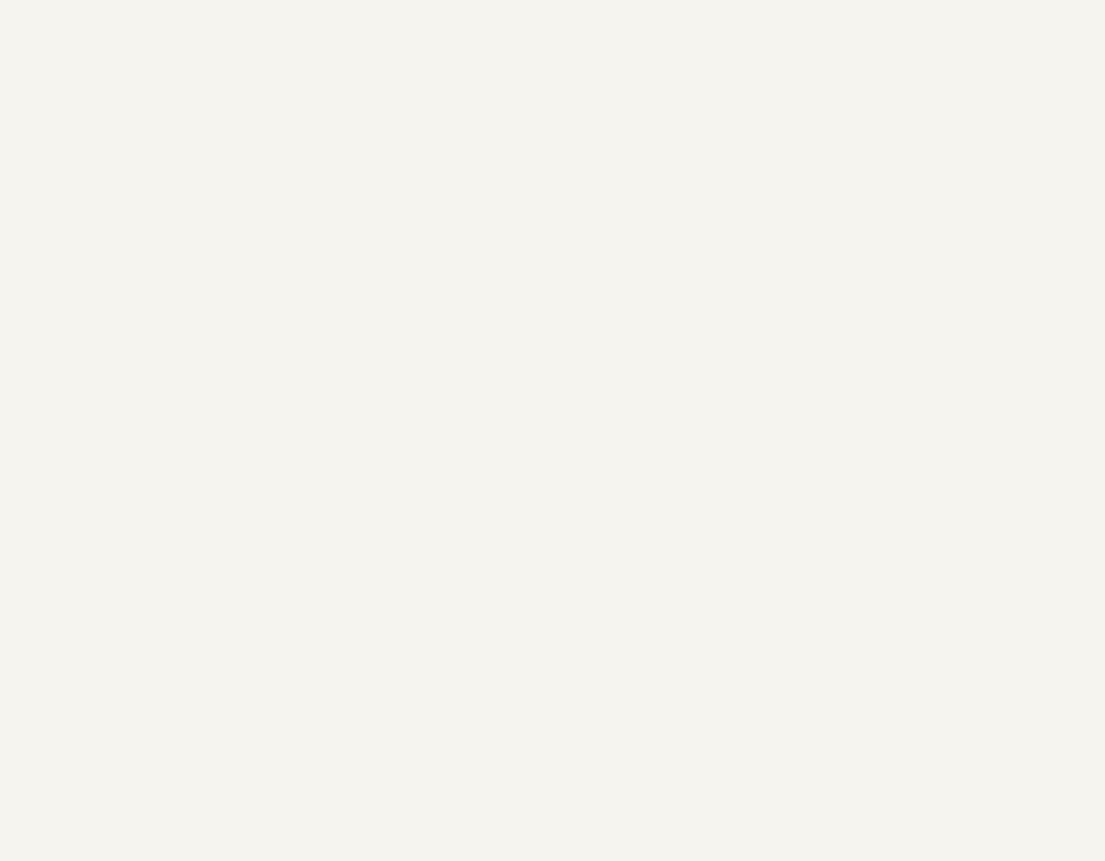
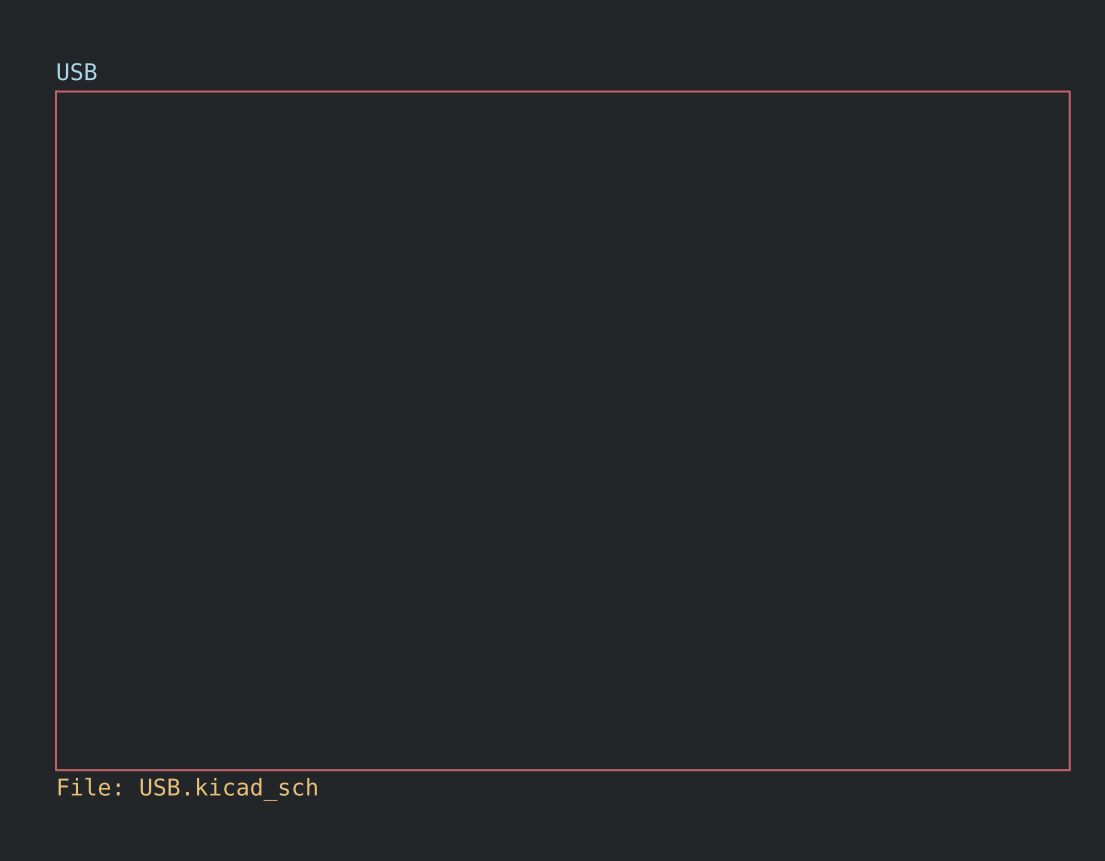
sheet USB: none -> File: USB.kicad_sch (562, 430)

